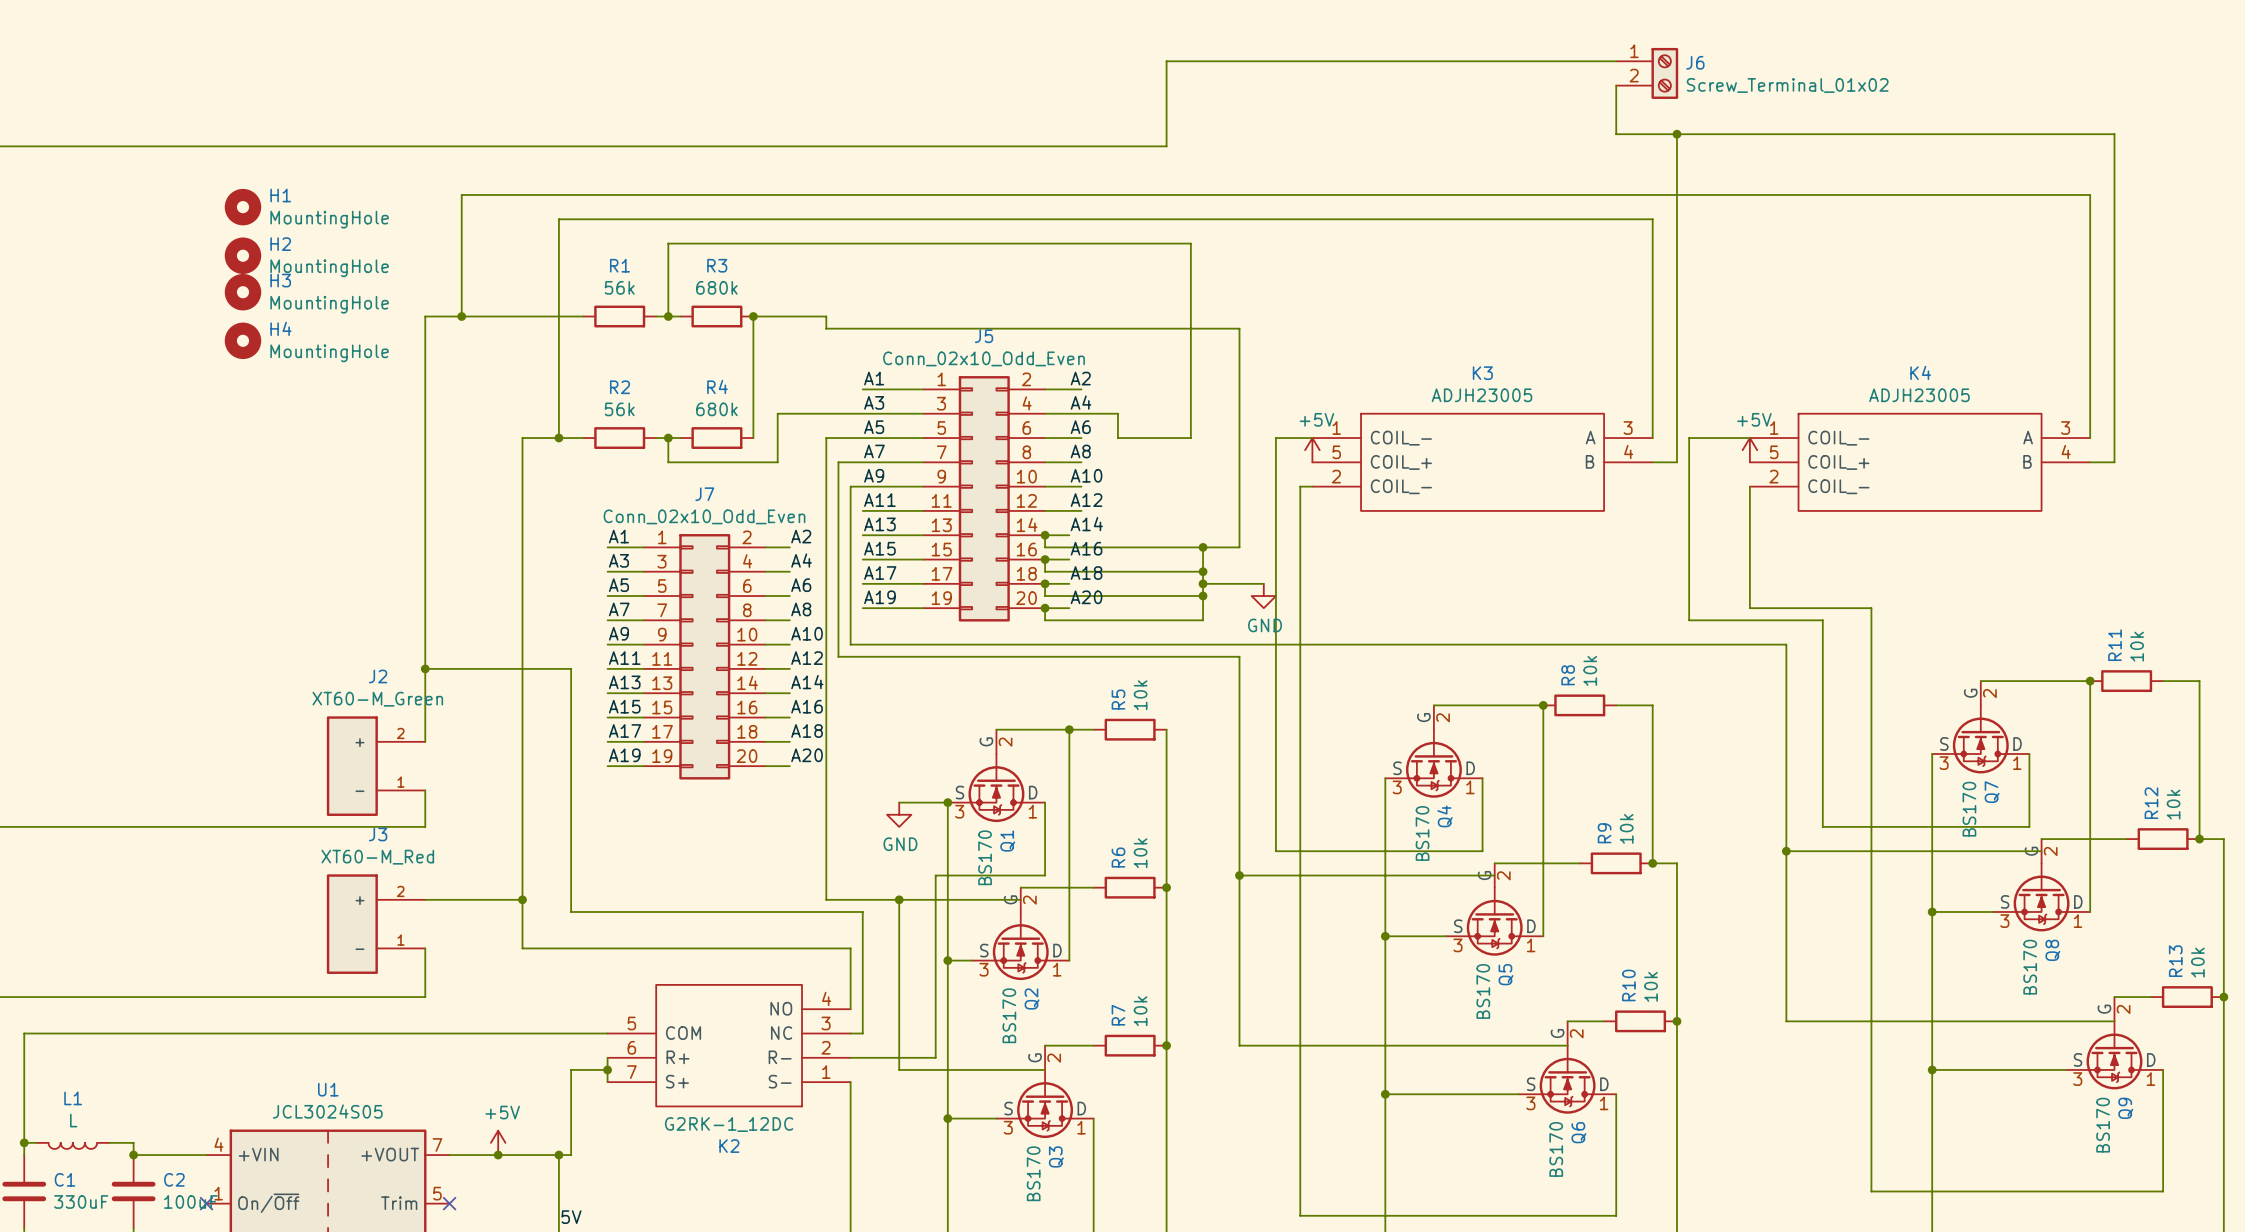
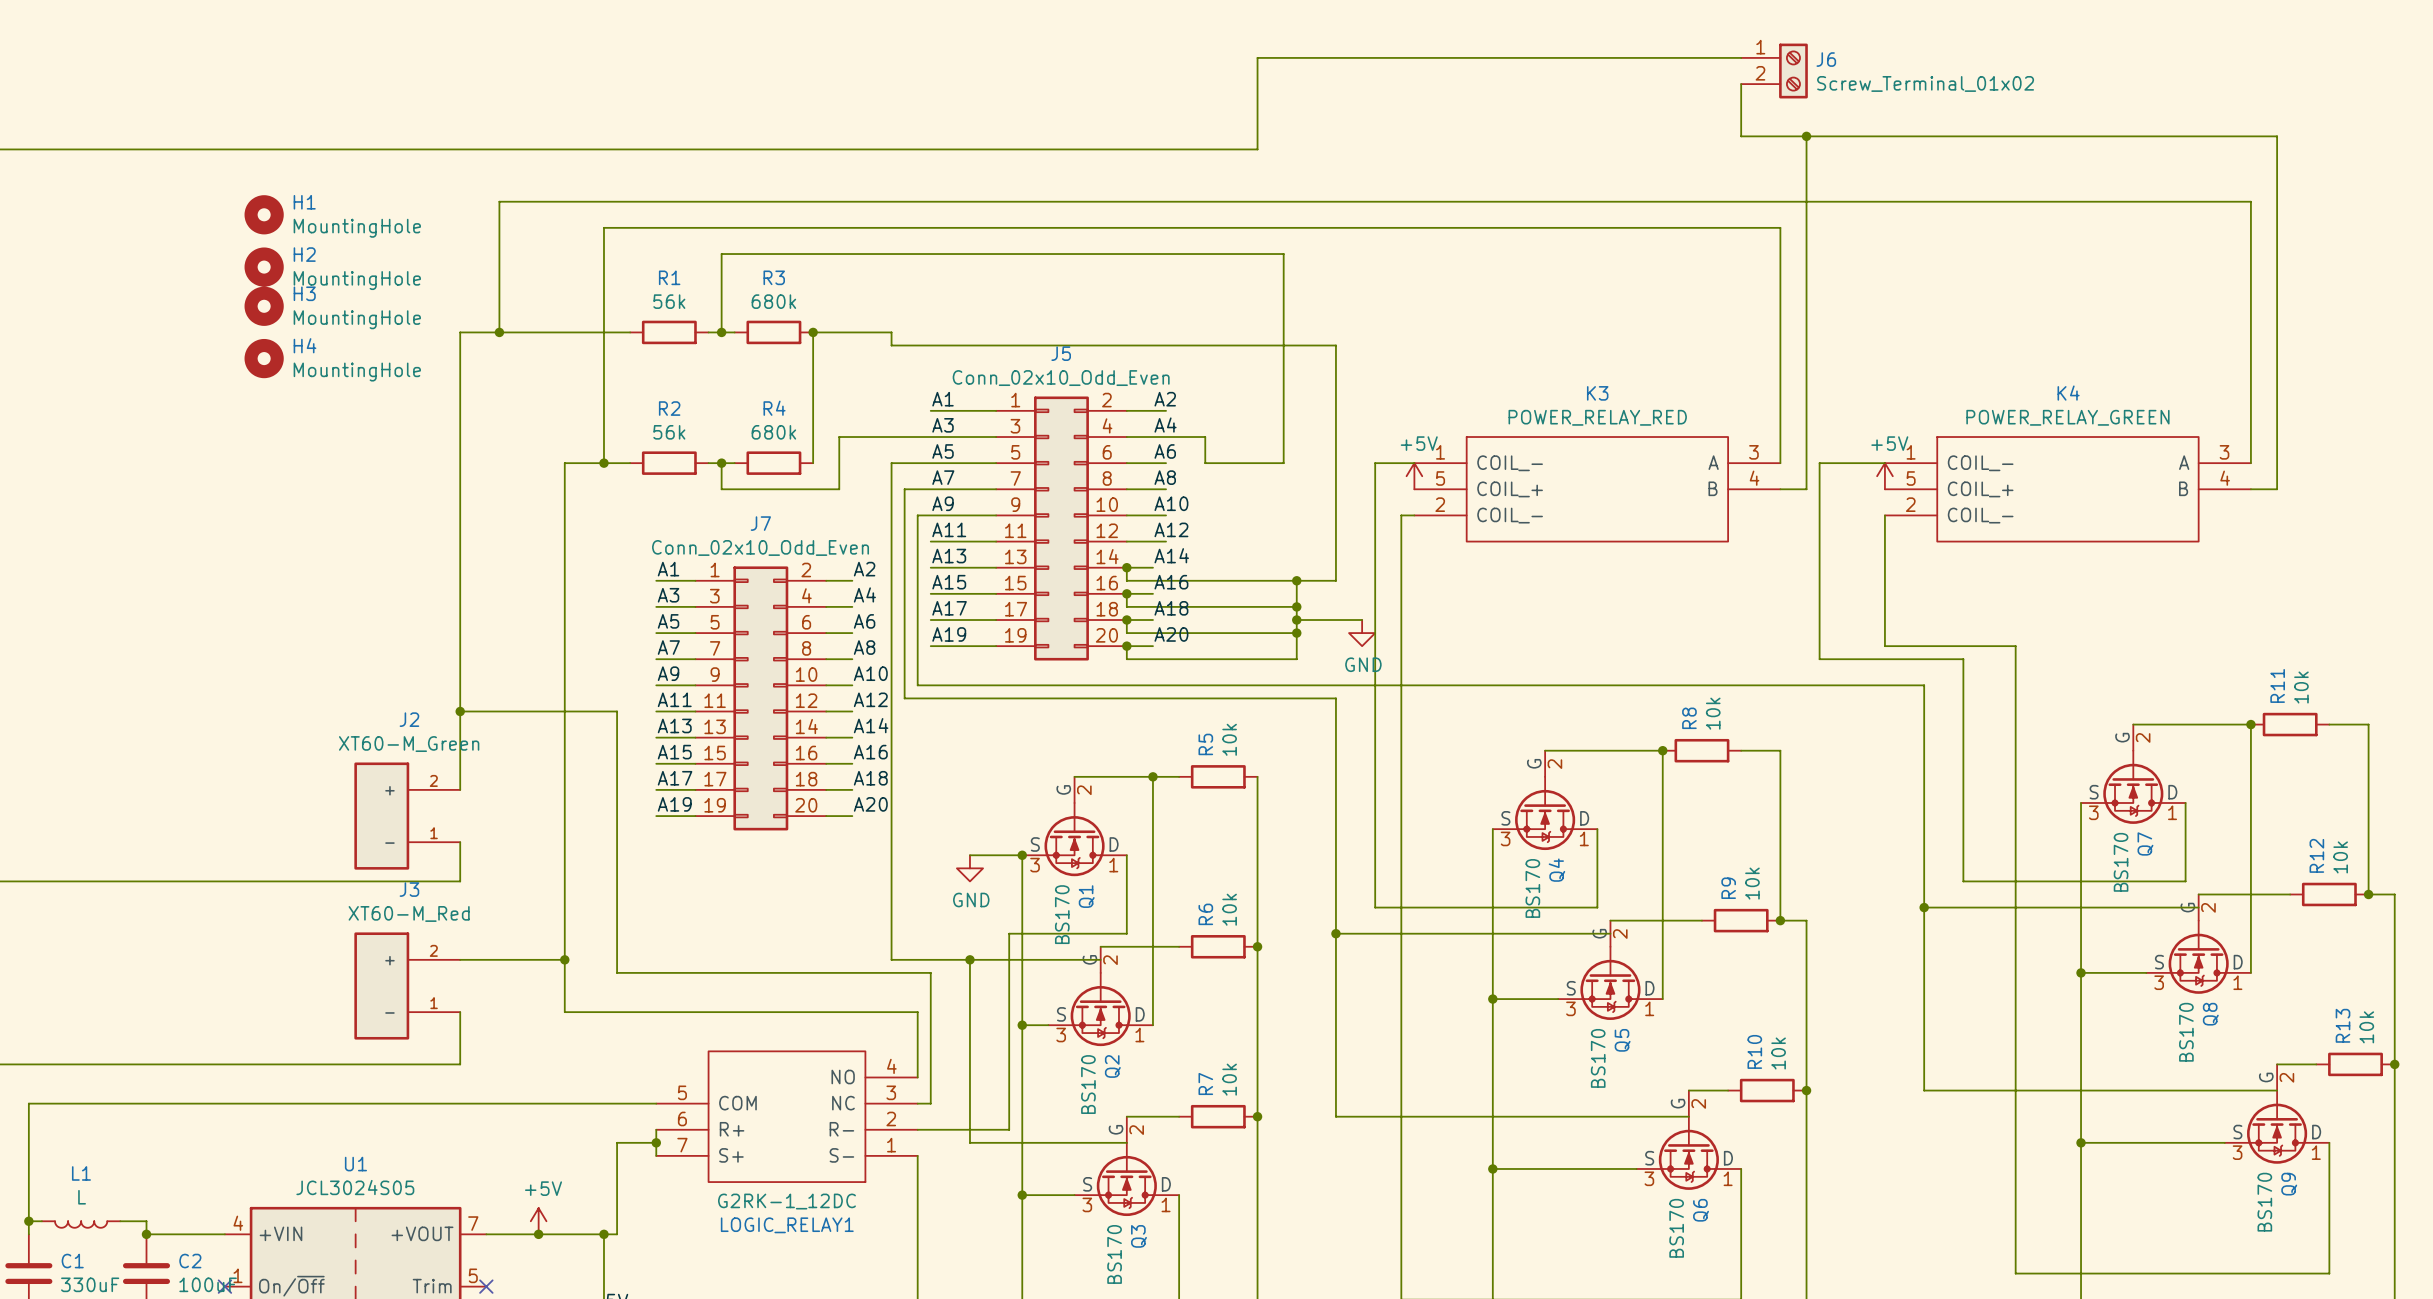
K3 value: ADJH23005 (1481, 395) -> POWER_RELAY_RED (1597, 417)
K4 value: ADJH23005 (1919, 395) -> POWER_RELAY_GREEN (2067, 417)
K2 name: K2 (729, 1146) -> LOGIC_RELAY1 (787, 1225)

